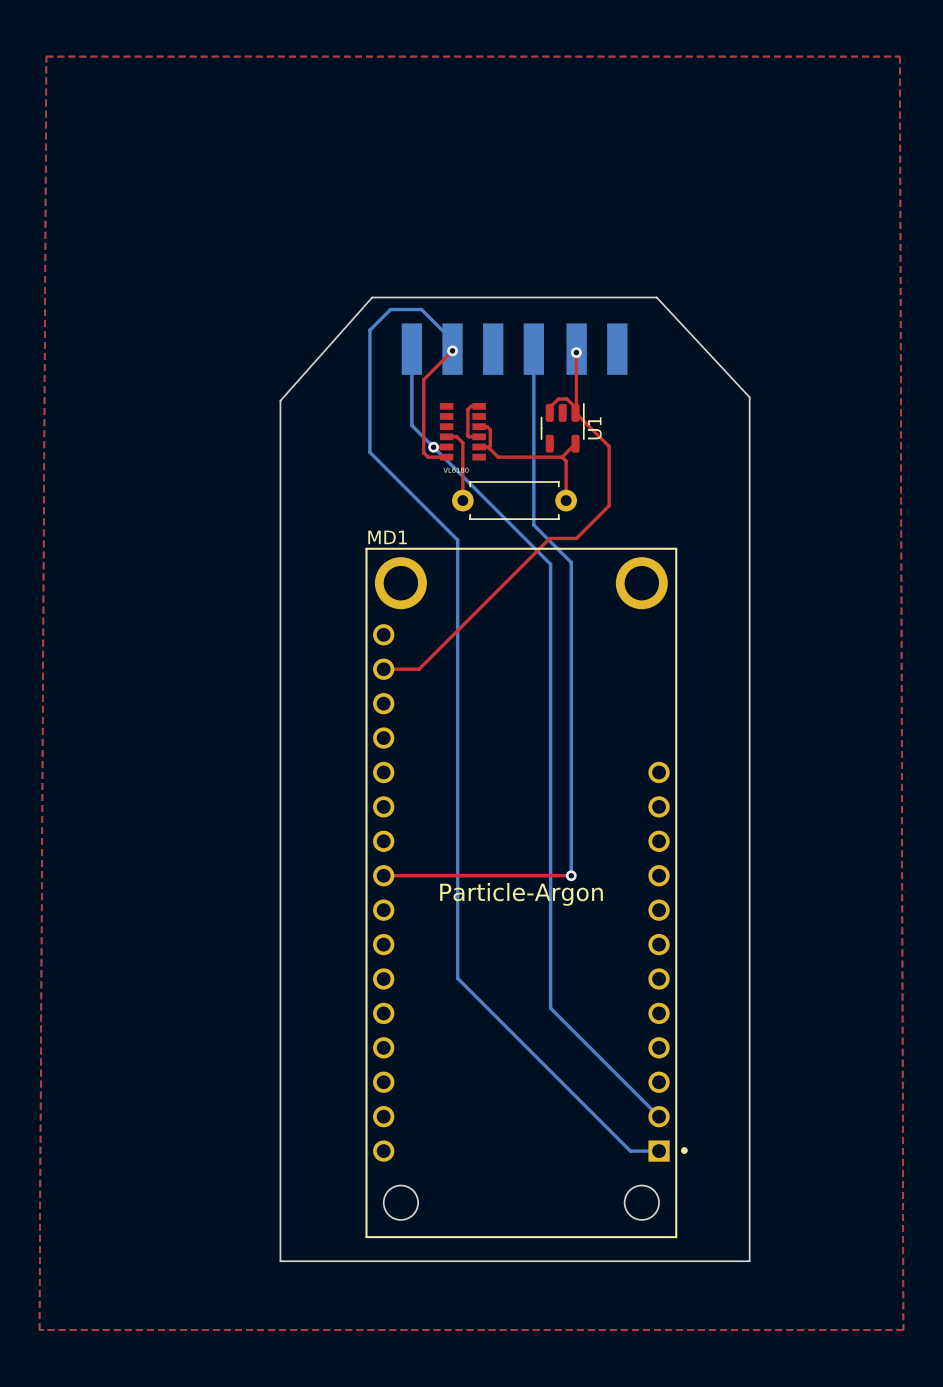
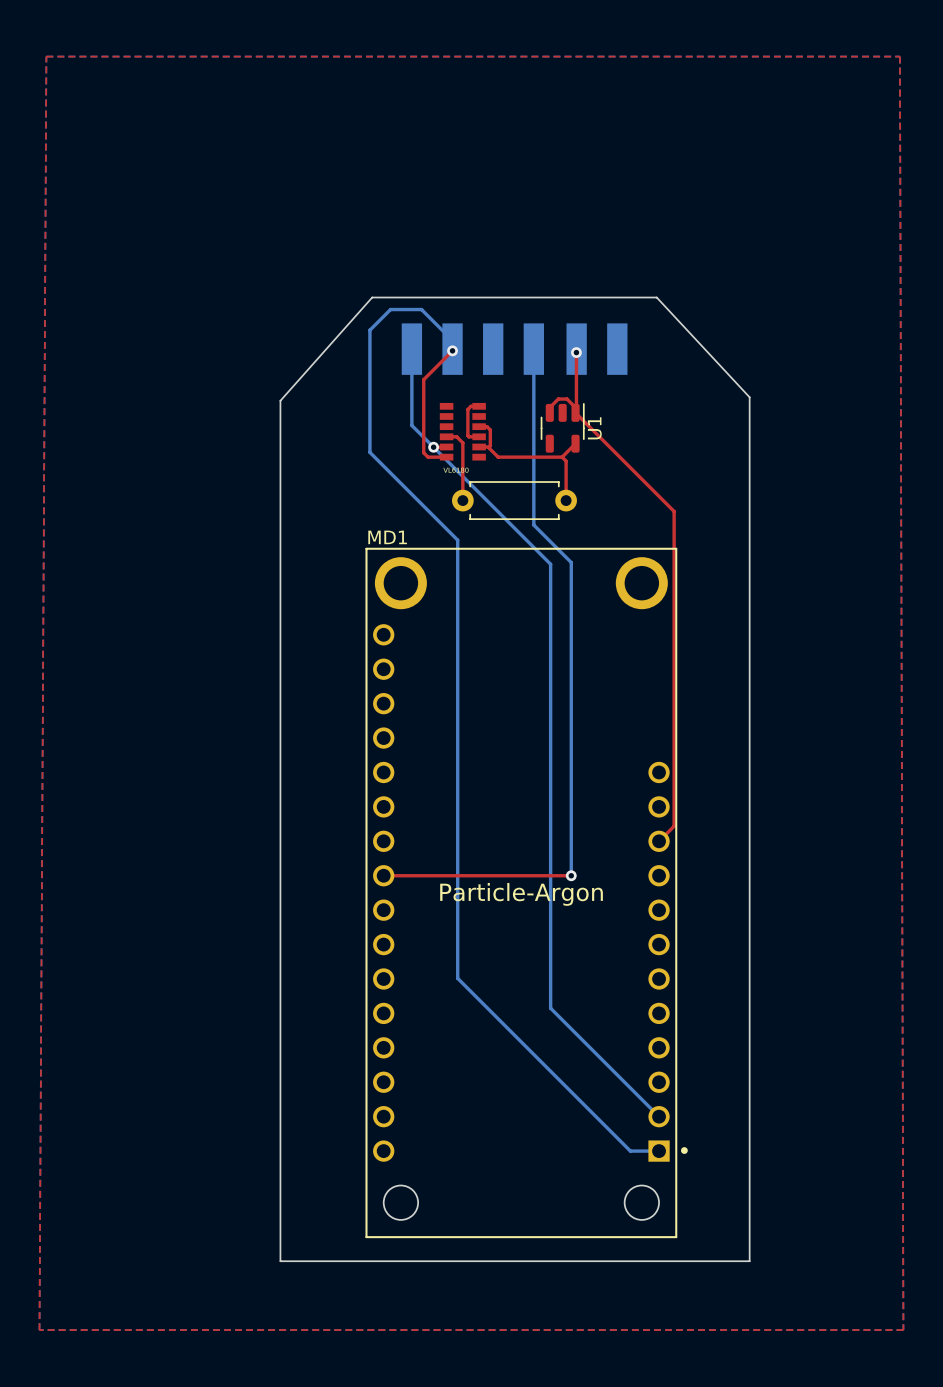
top track: (609, 446) (609, 505) (576, 538) (549, 538) (419, 669) (383, 669) -> (609, 446) (674, 511) (674, 826) (659, 841)

